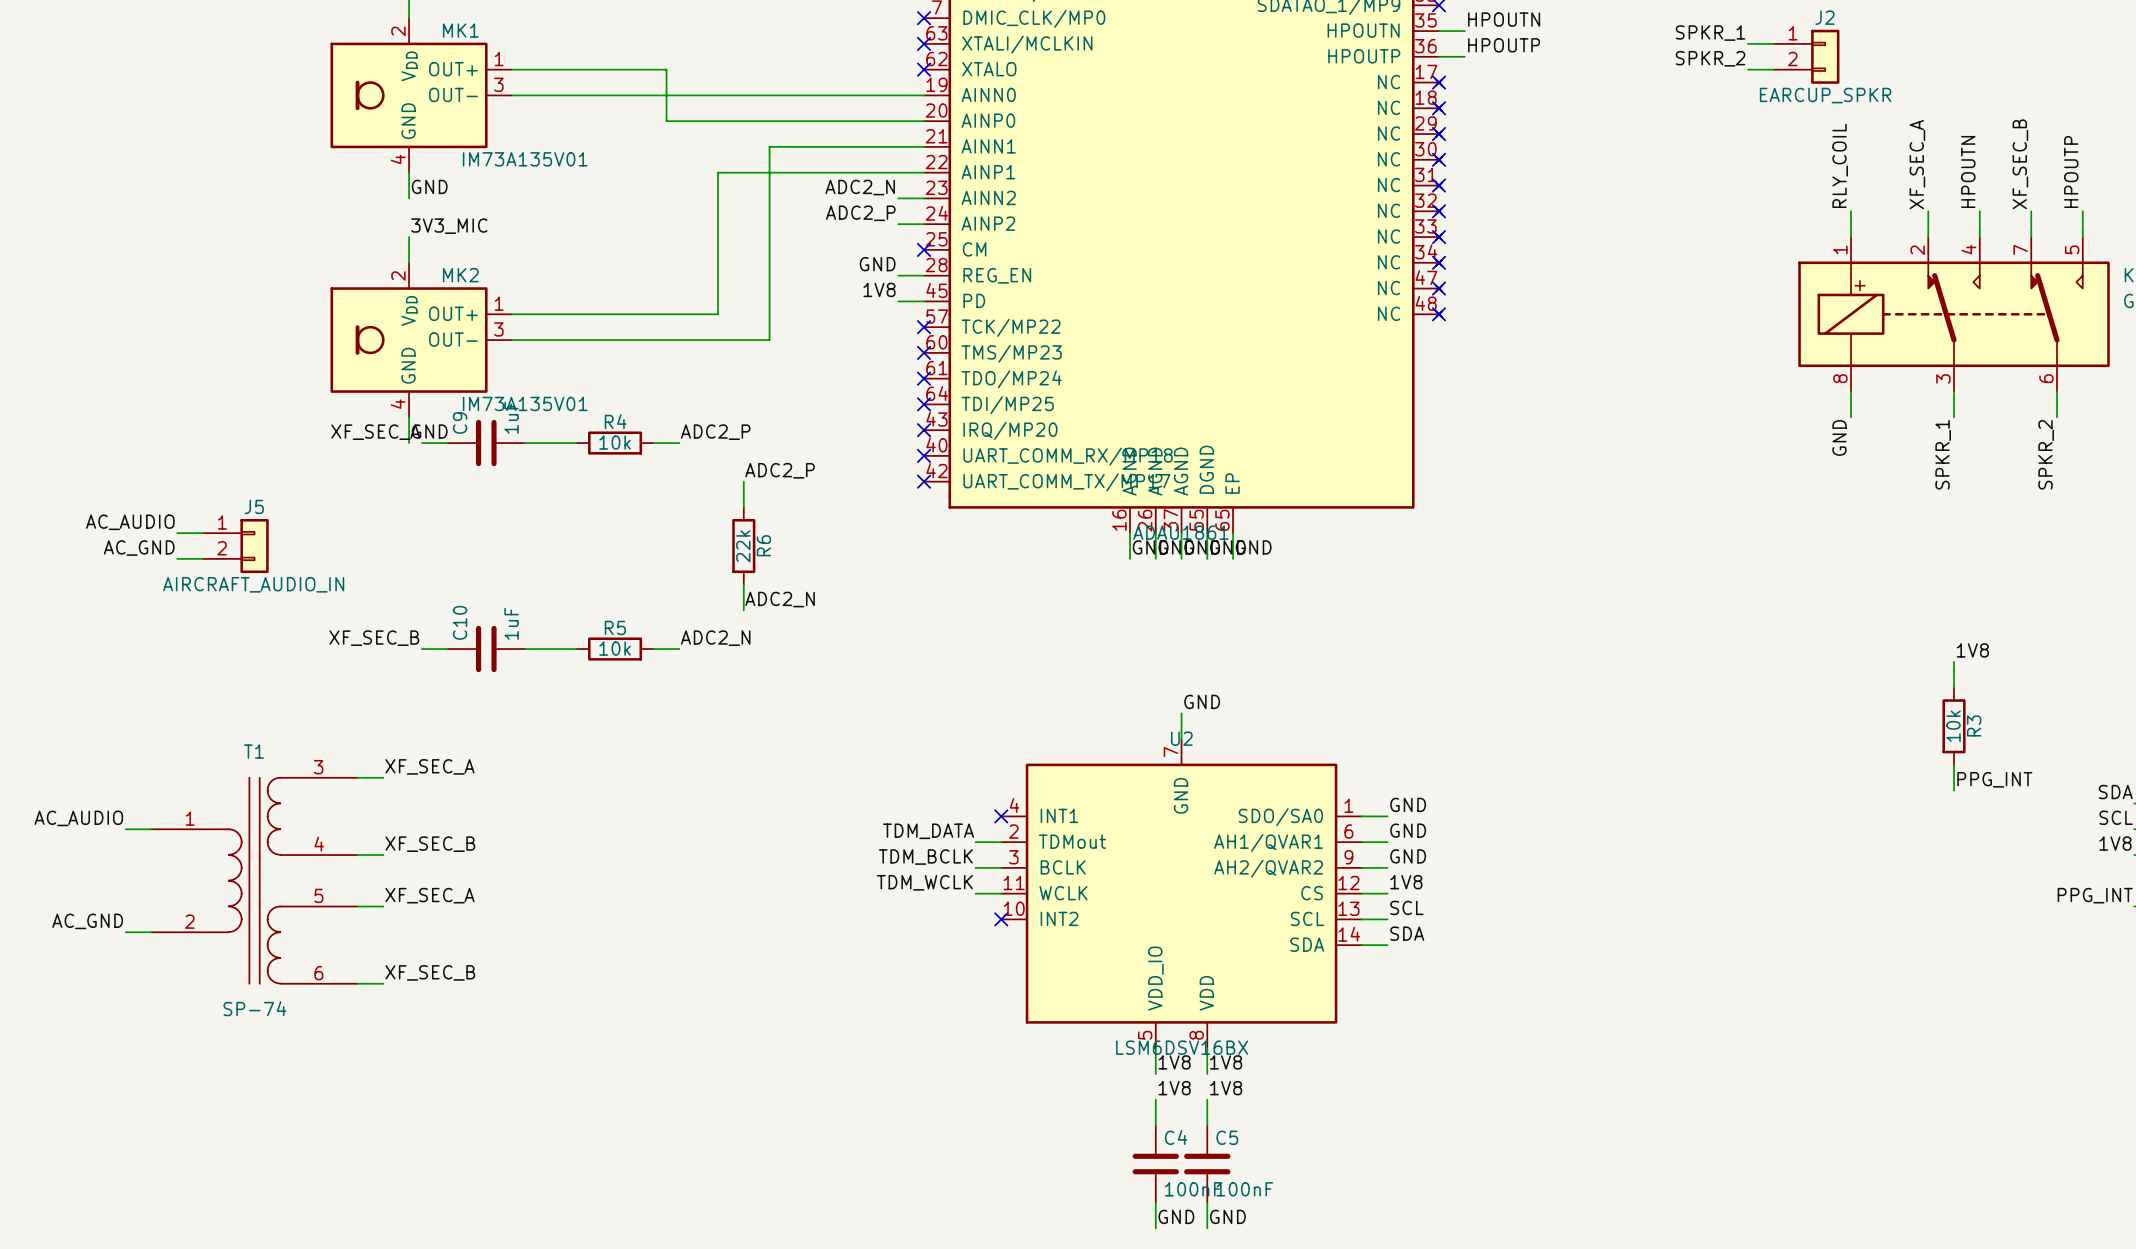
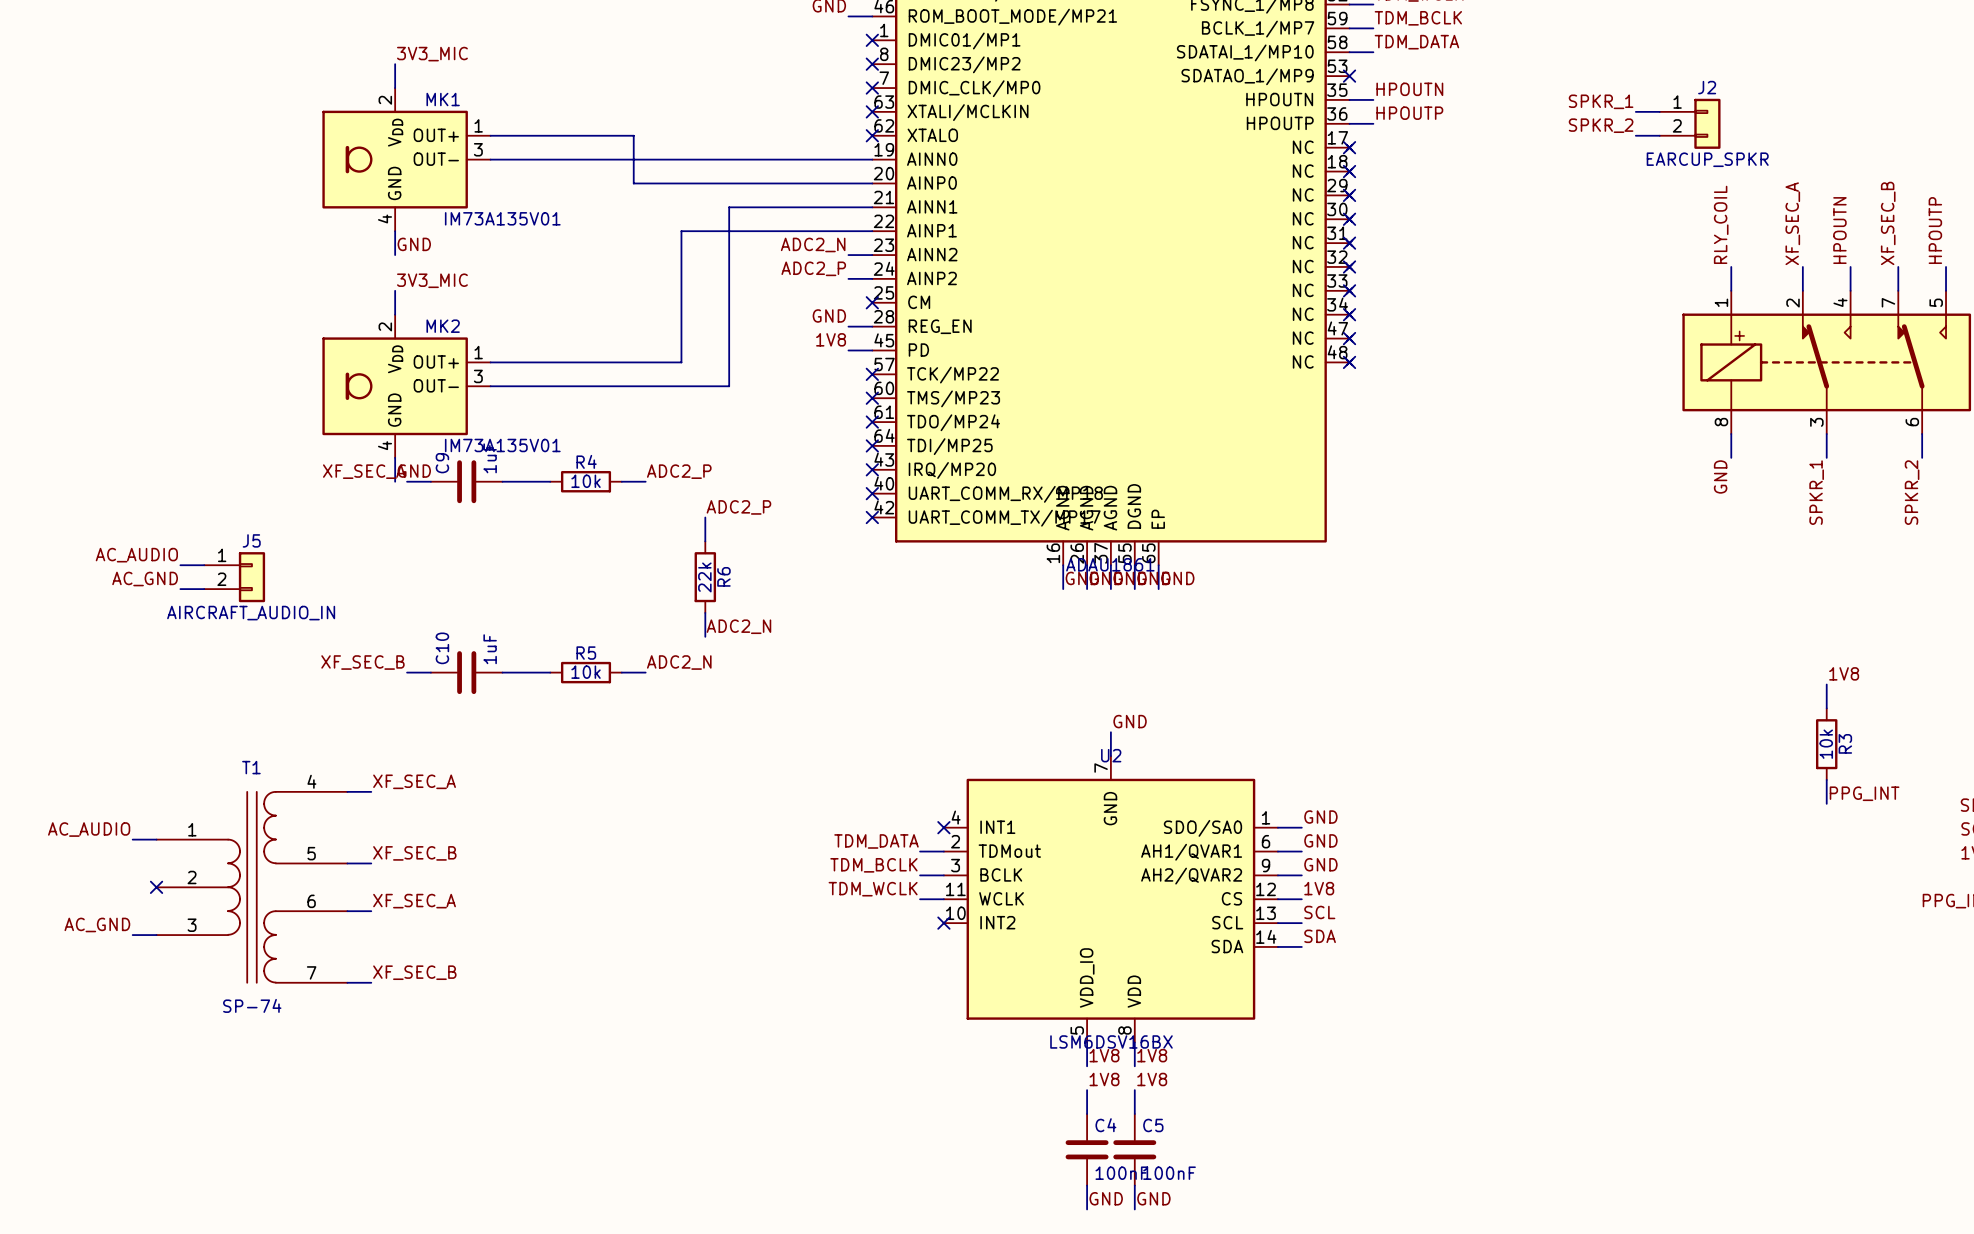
T1 symbol: [151, 777, 358, 984] -> [156, 791, 348, 983]
no-connect mark: none -> (156, 887)

